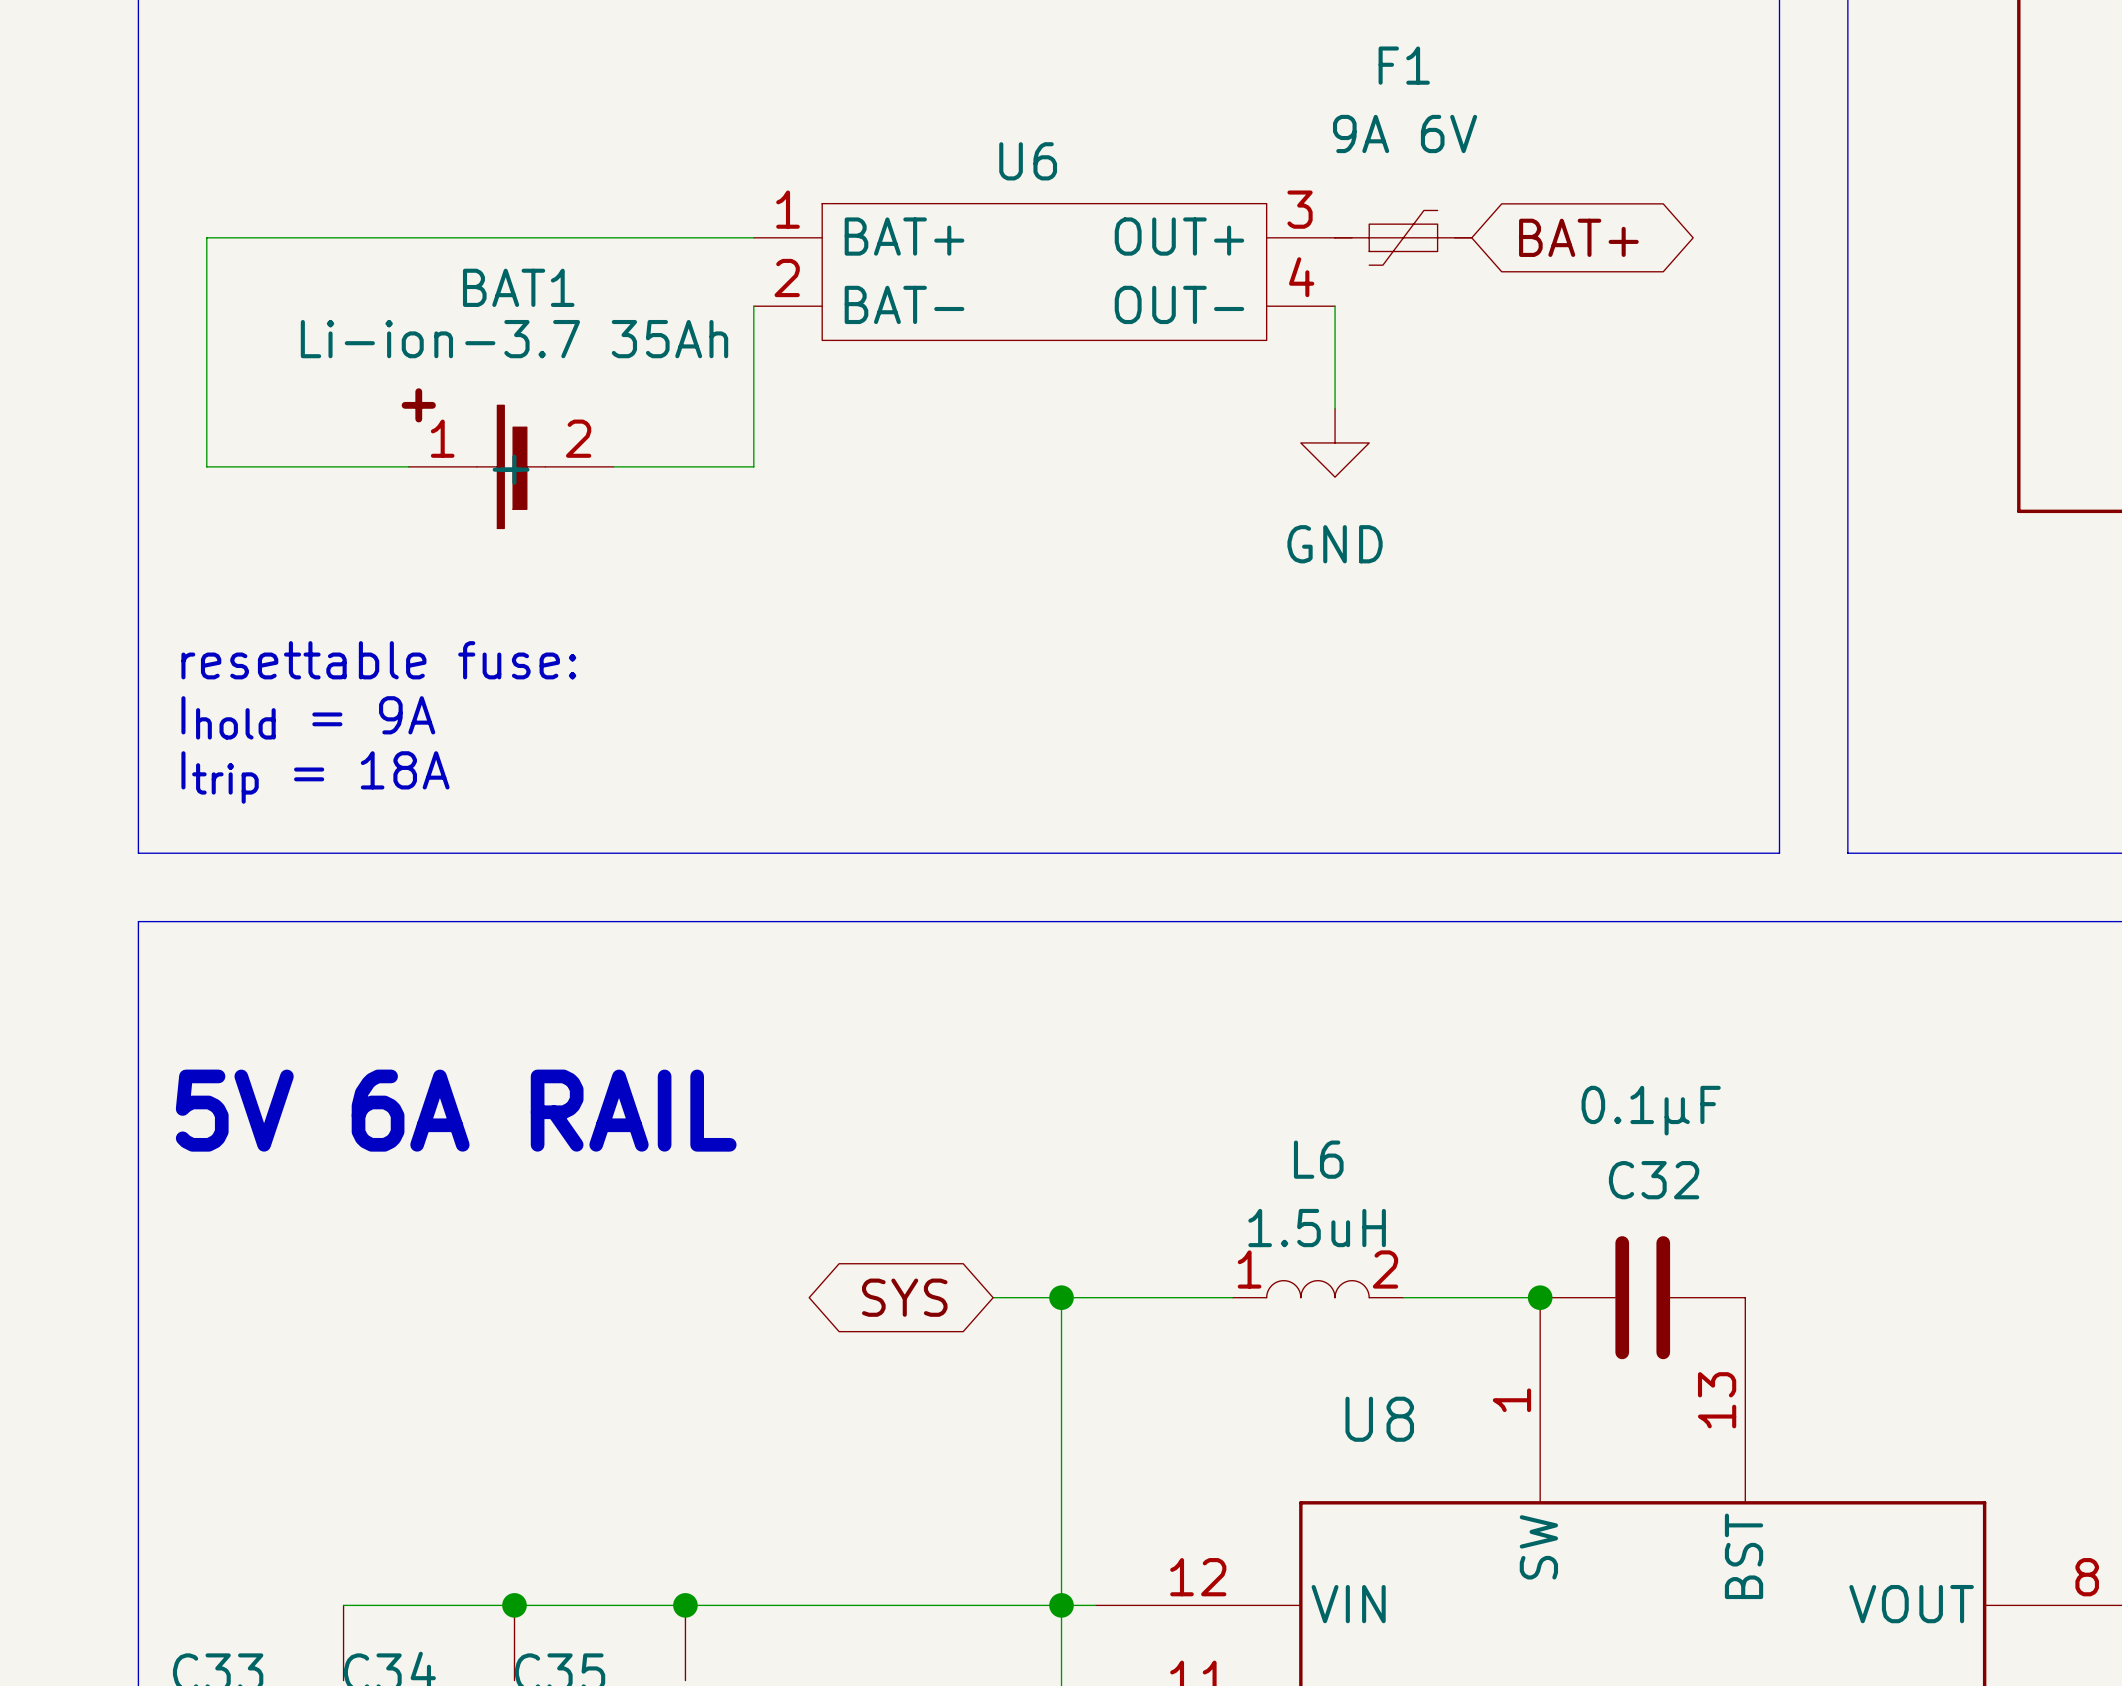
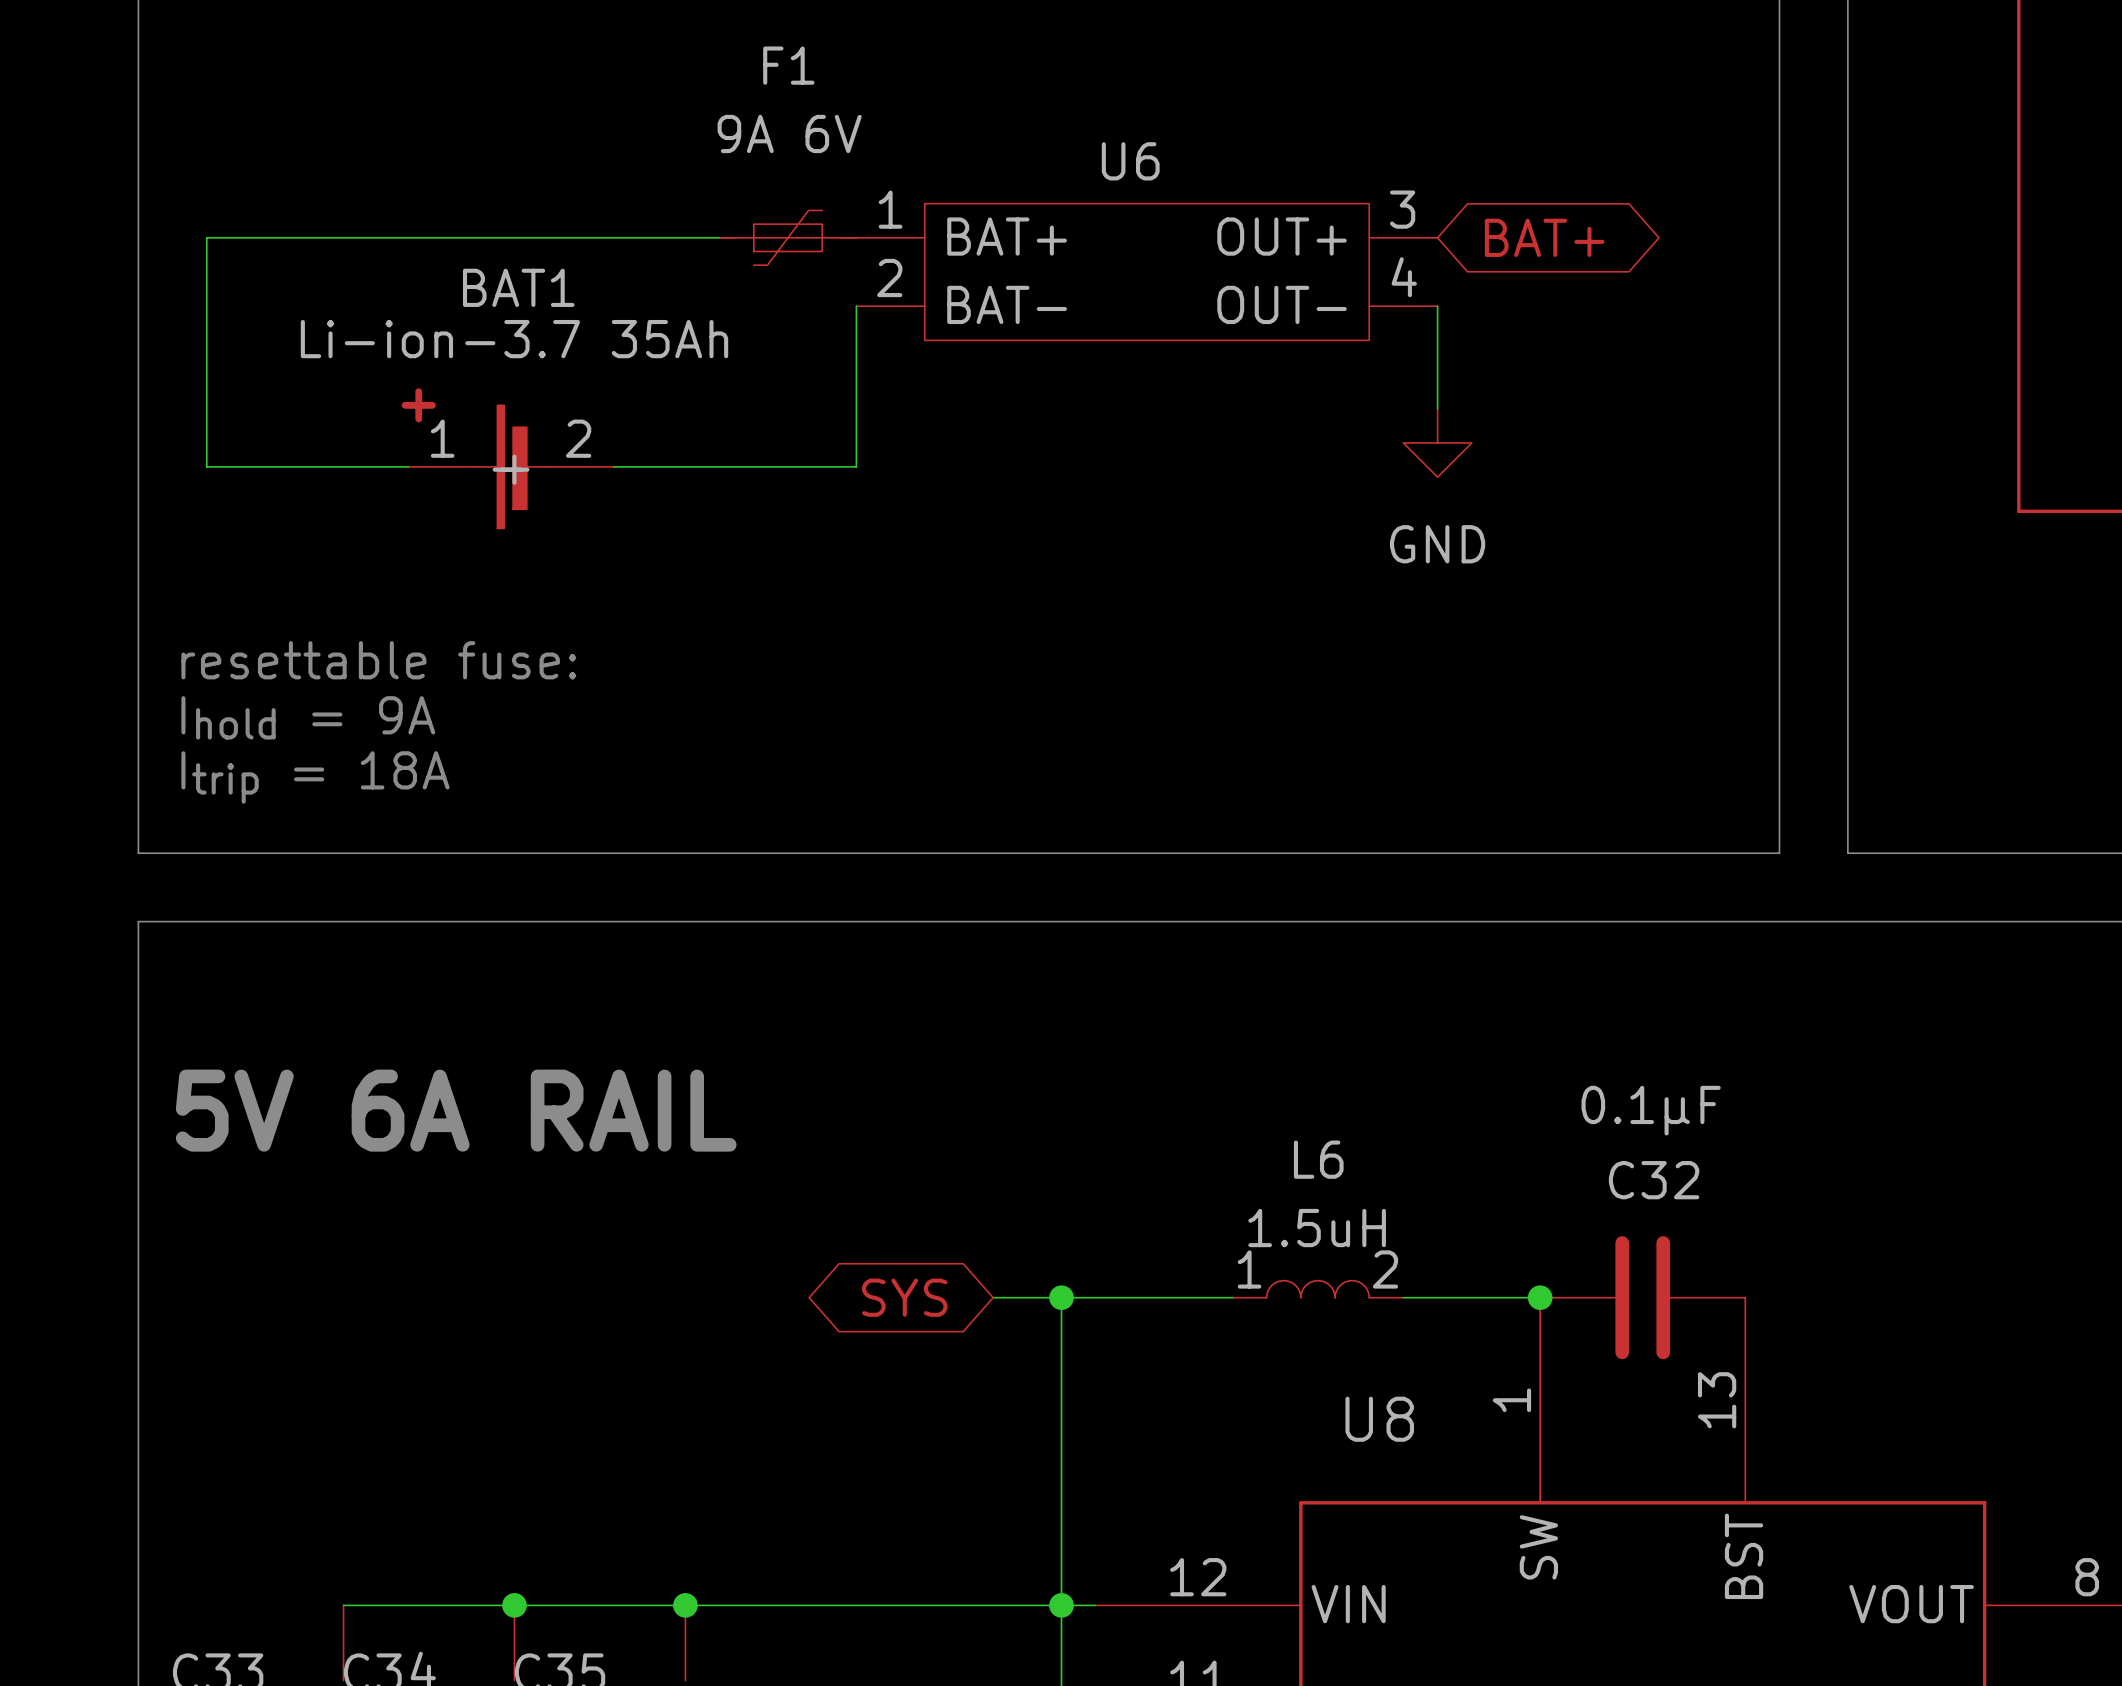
F1 position: (1403, 237) -> (788, 237)
global label position: BAT+ (1578, 237) -> BAT+ (1544, 237)
U6 position: (1044, 272) -> (1146, 272)
wire: (753, 306) (753, 466) -> (856, 306) (856, 466) (753, 466)
wire: (1335, 306) (1335, 408) -> (1437, 306) (1437, 408)
power symbol position: GND (1335, 442) -> GND (1437, 442)

